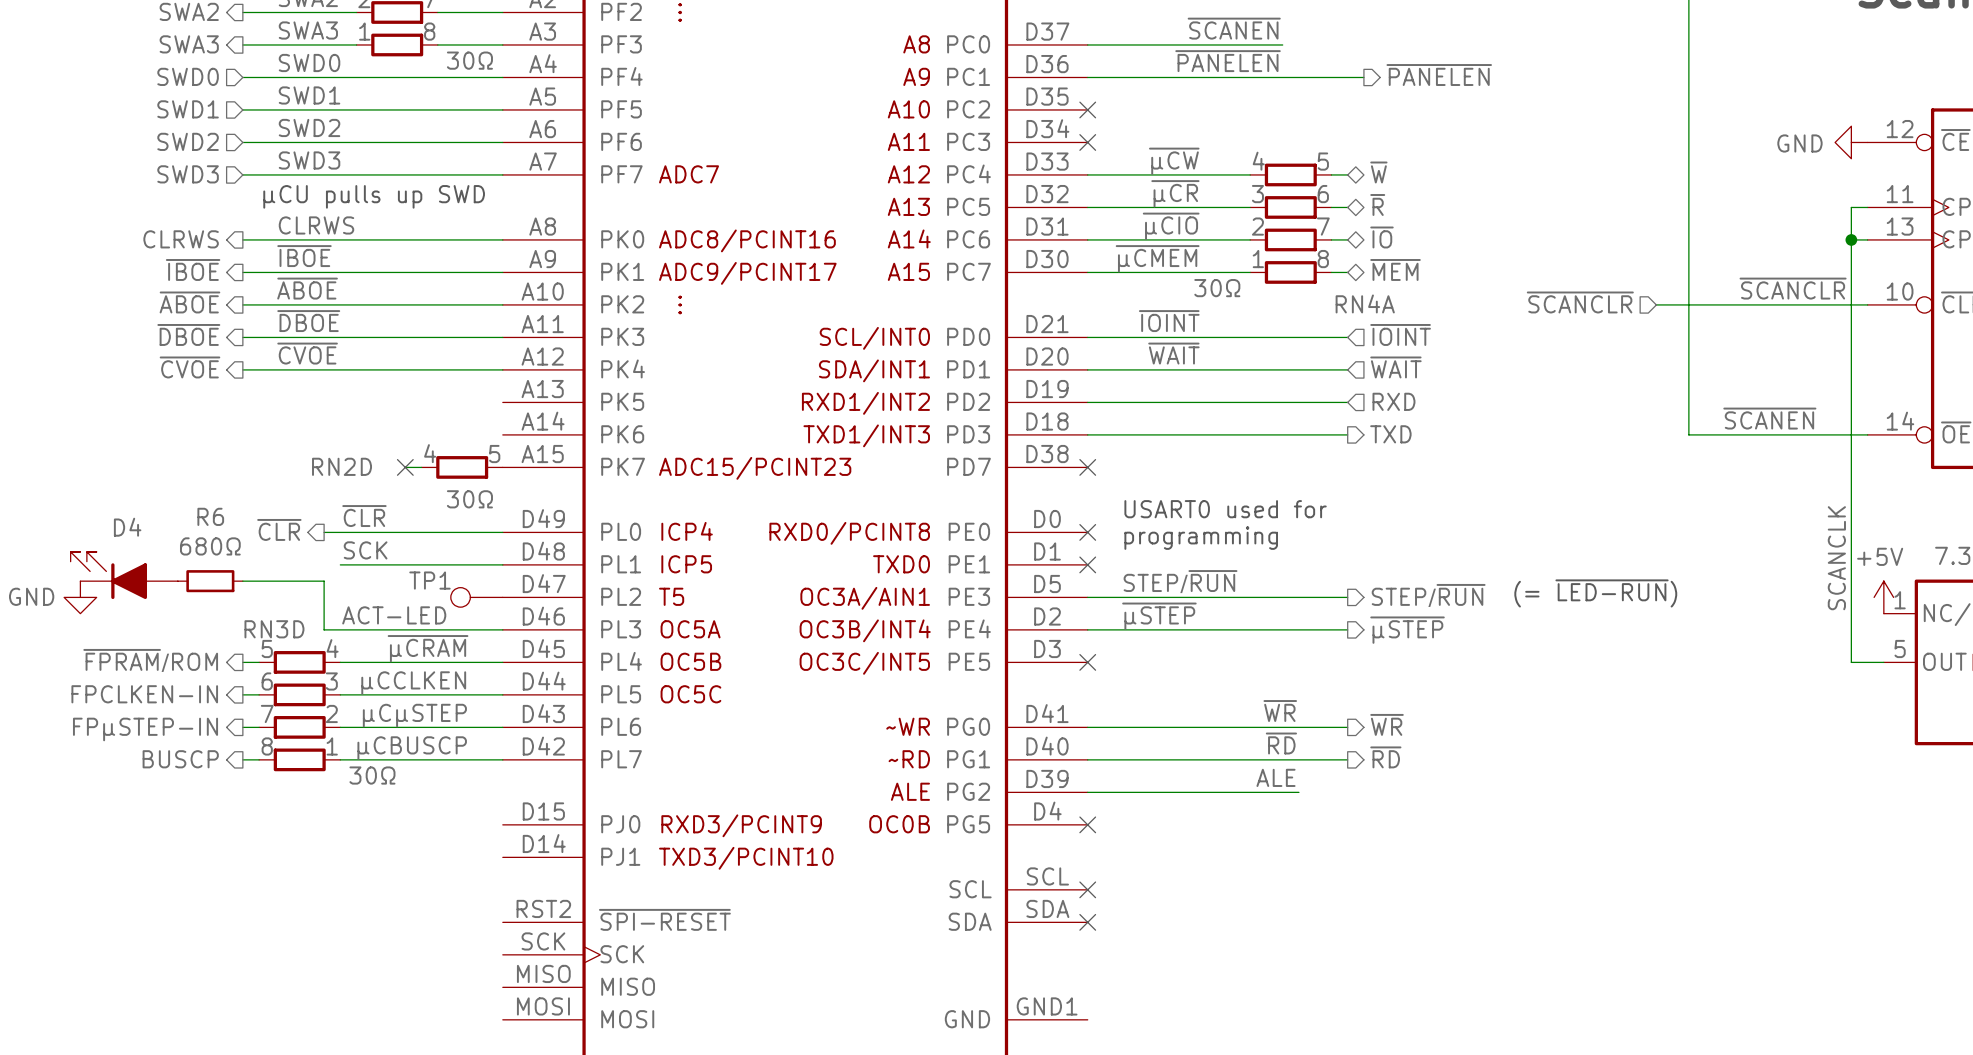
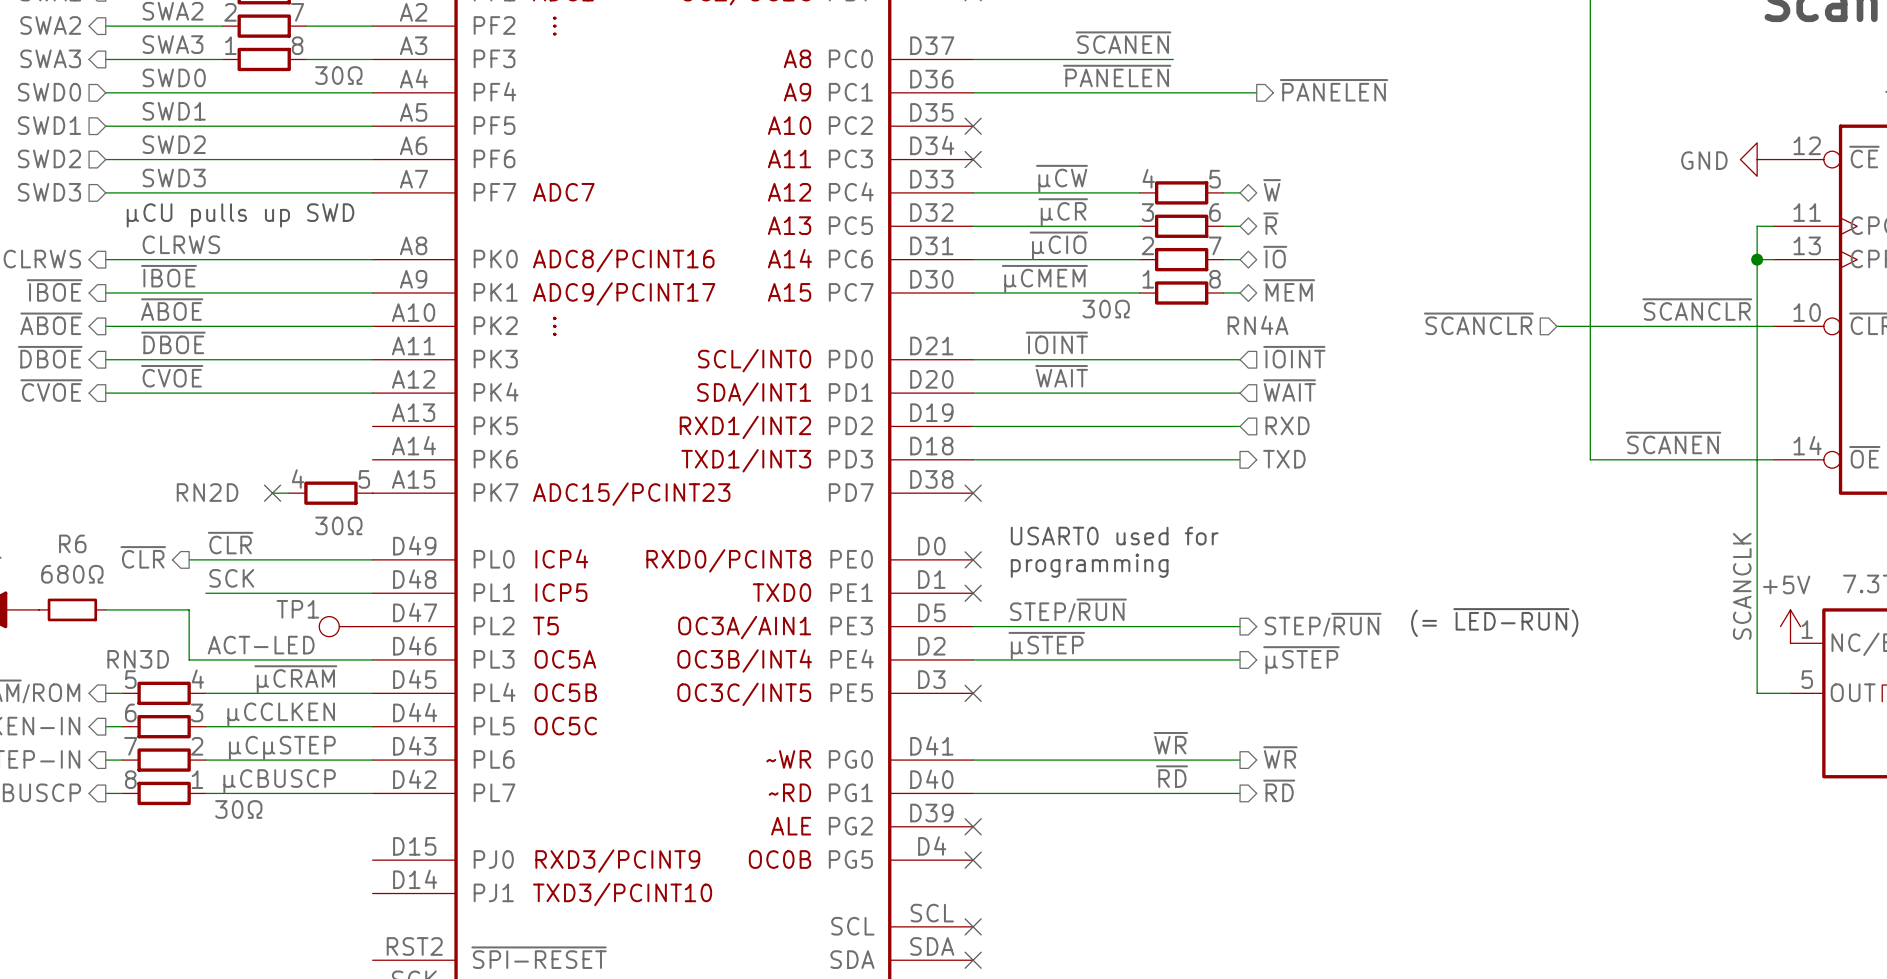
label: ALE (1276, 777) -> none
wire: (1087, 792) (1298, 792) -> none
no-connect mark: none -> (973, 826)

